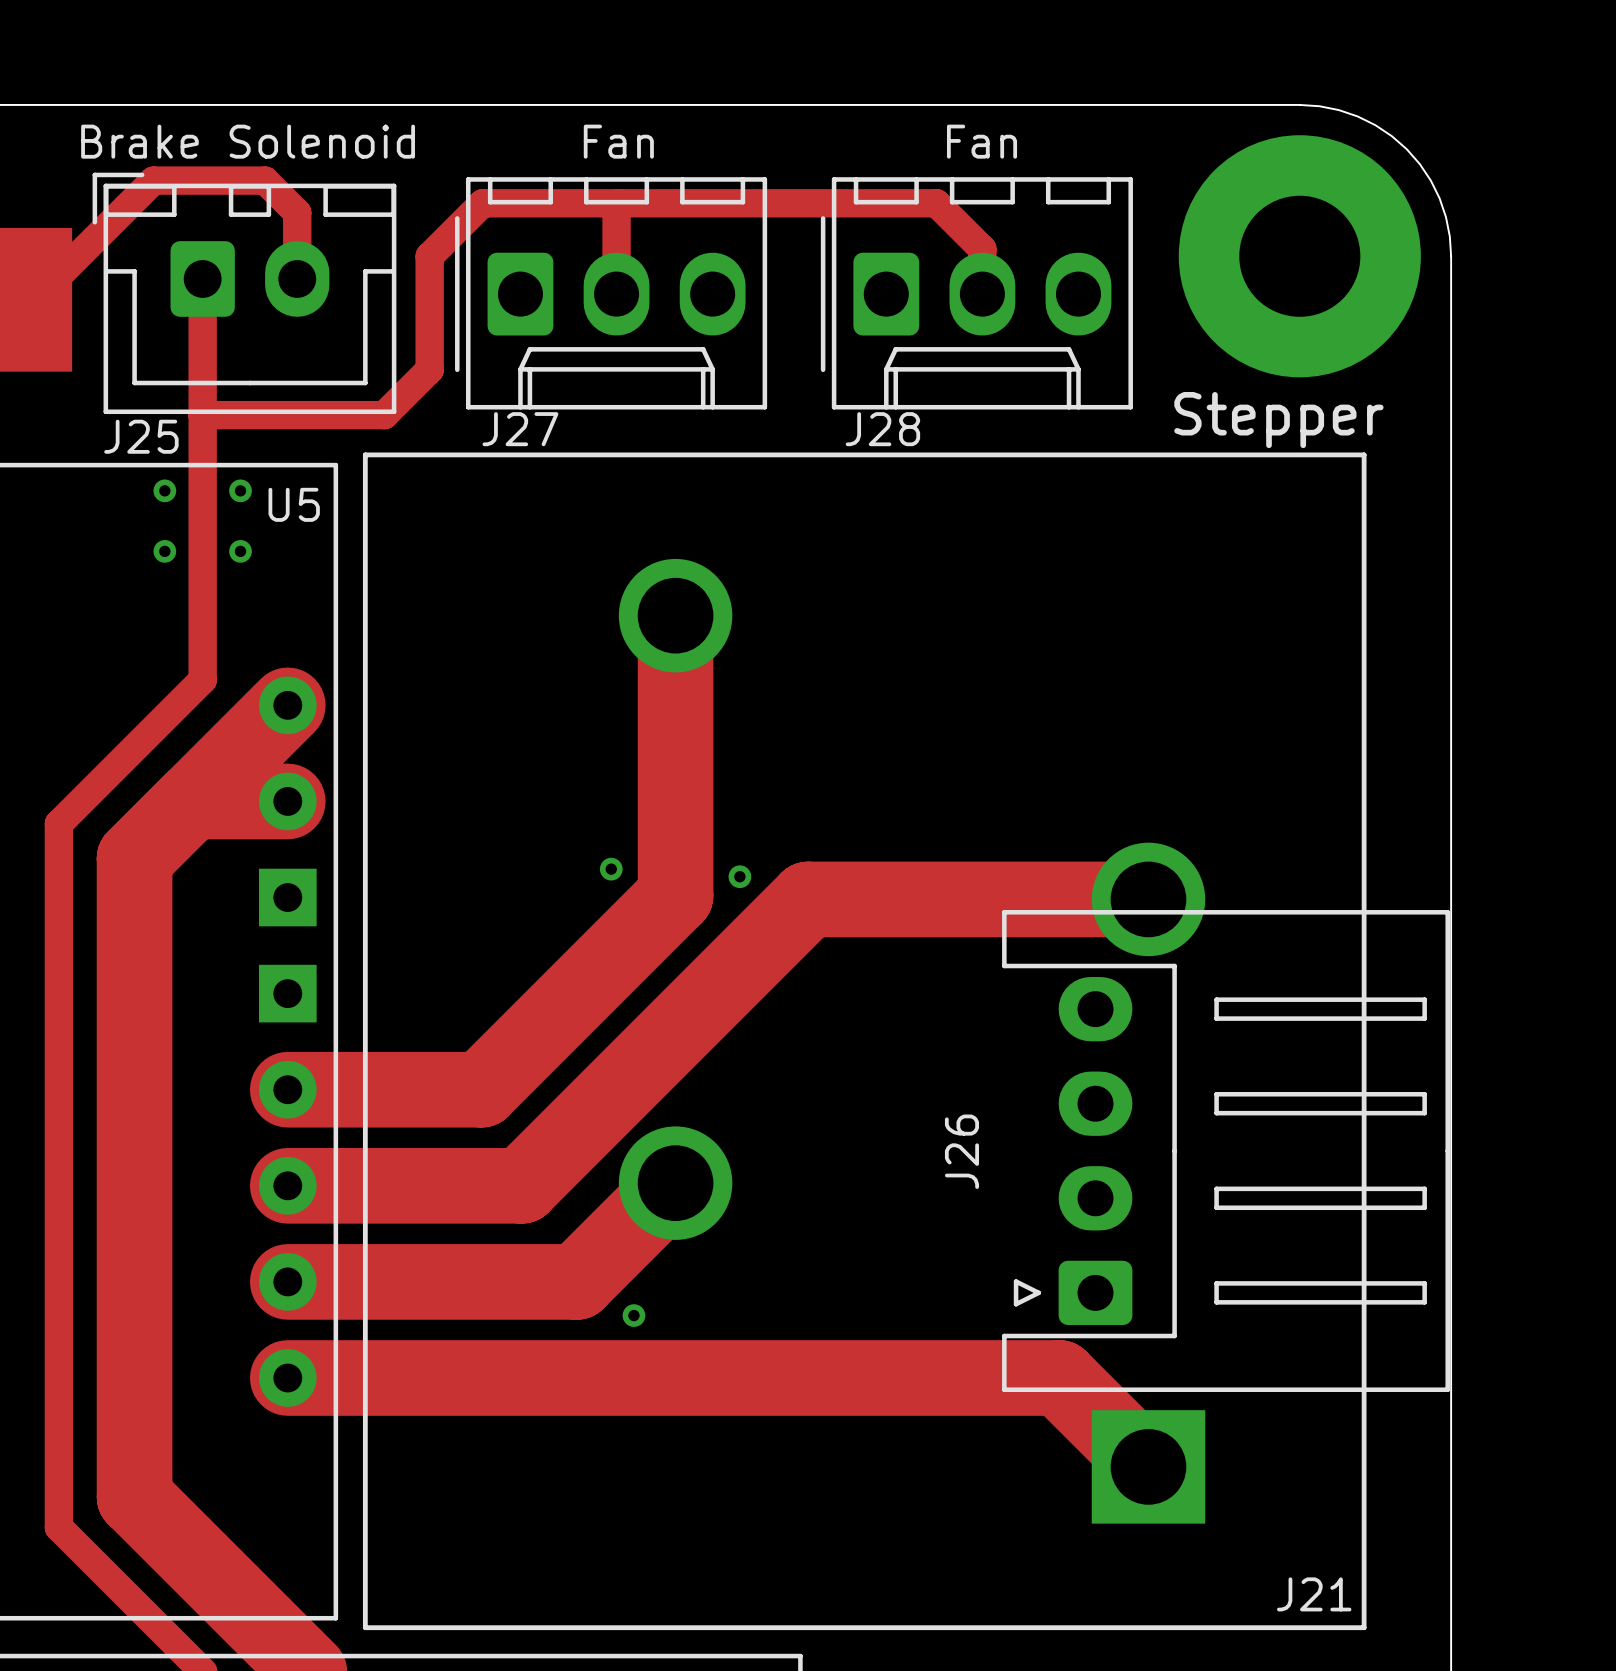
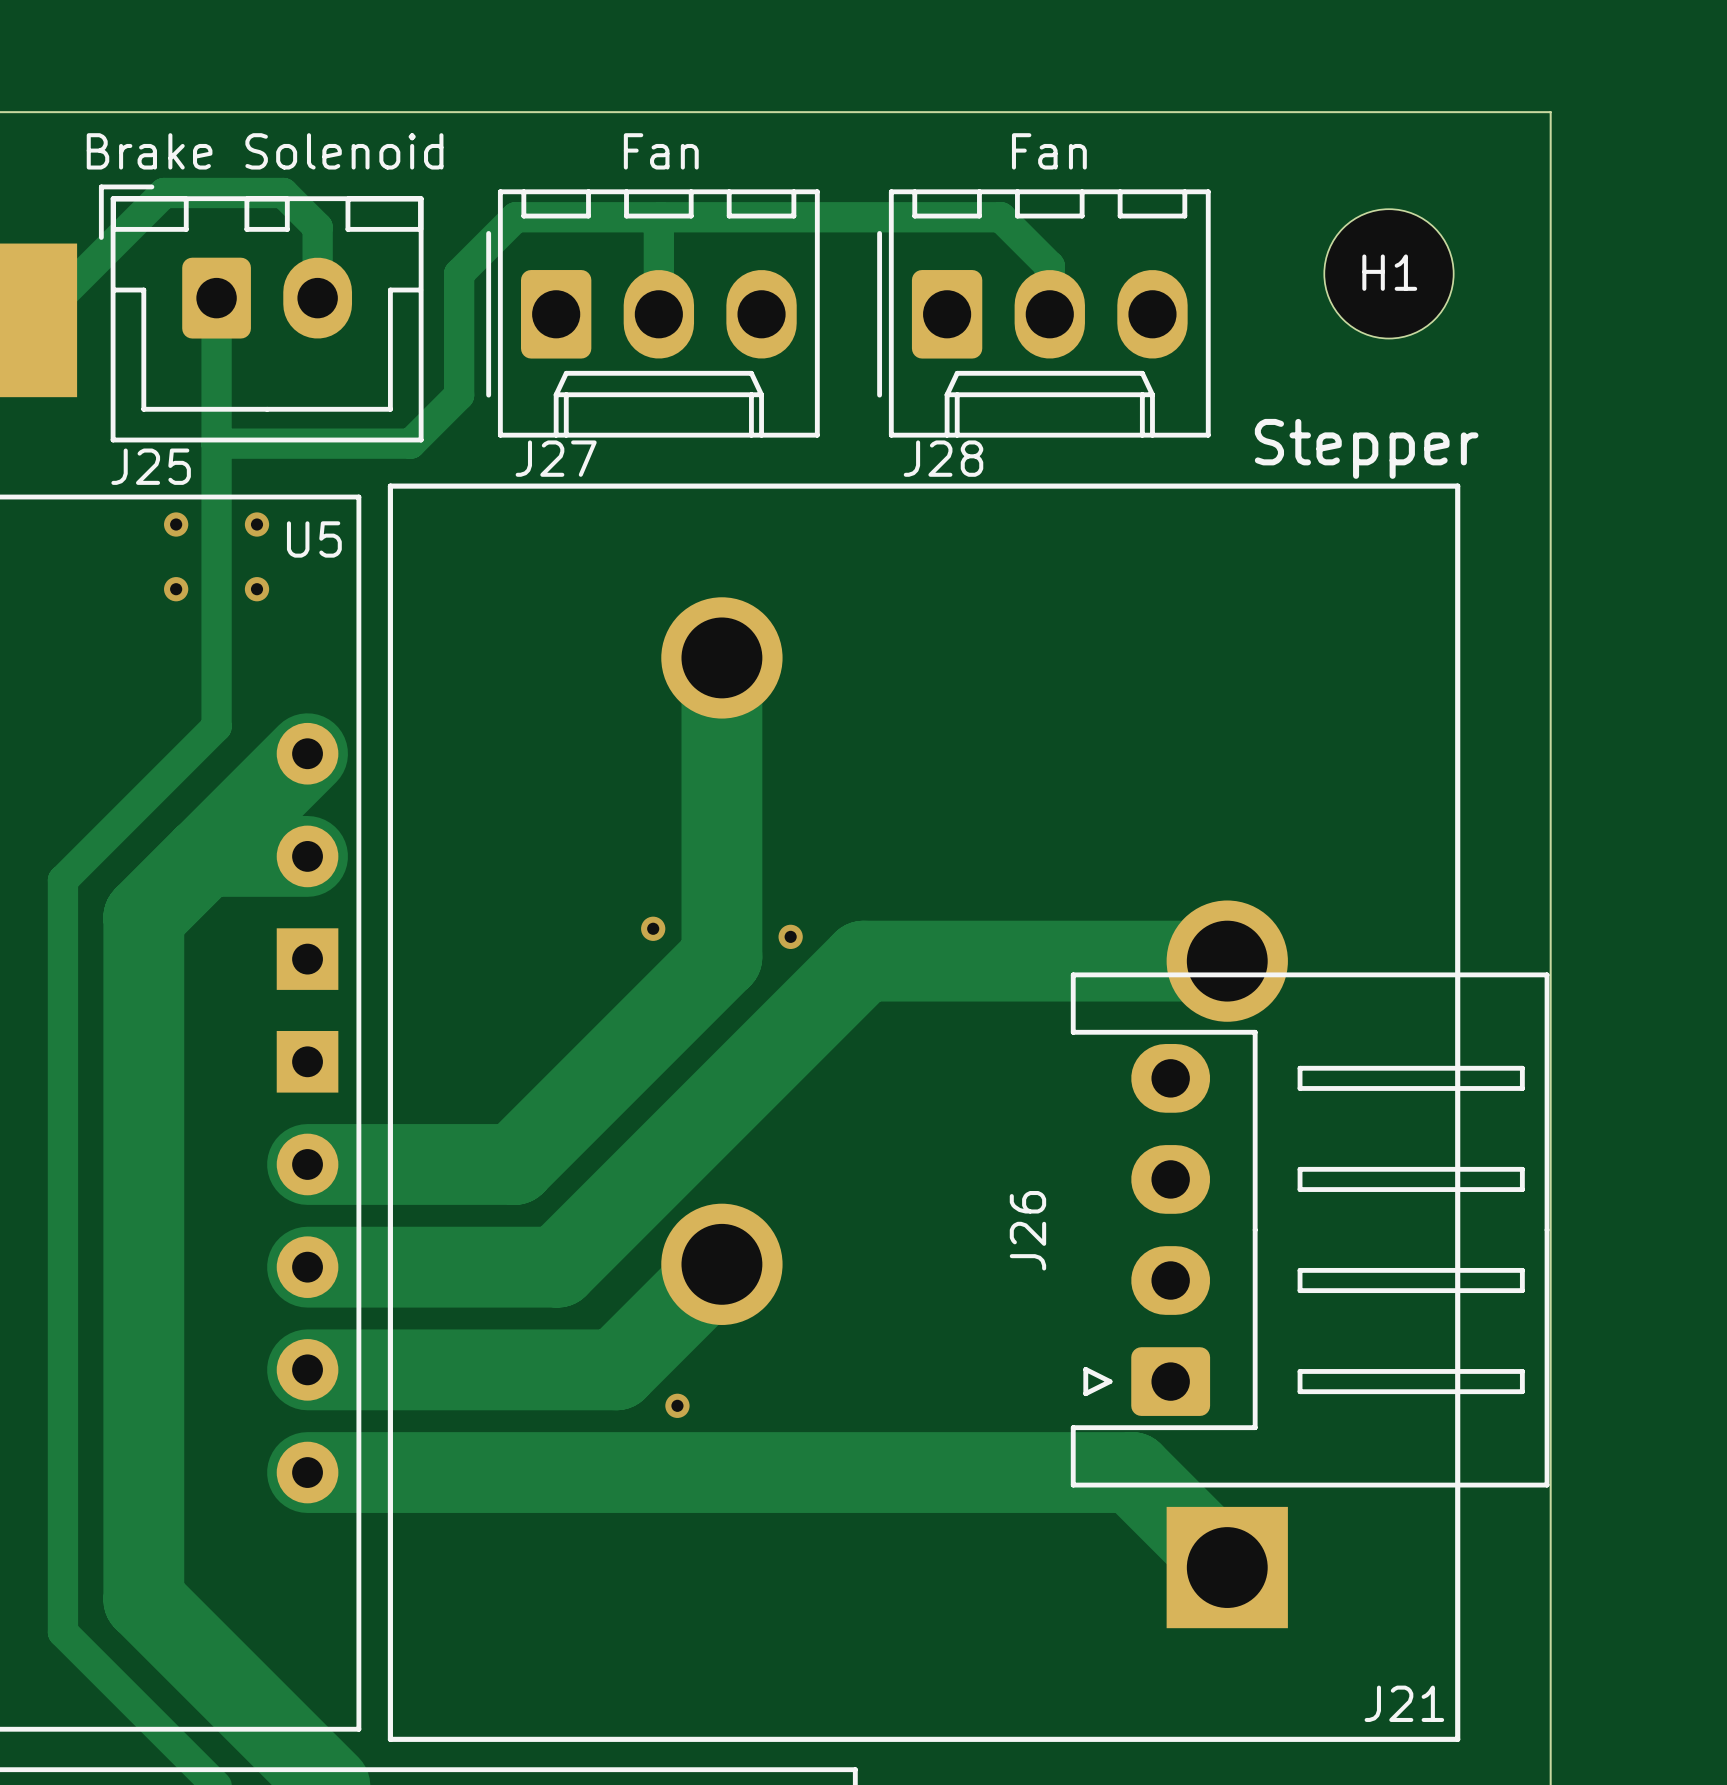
board edge: (1299, 104) (1319, 106) (1357, 116) (1375, 125) (1406, 149) (1430, 180) (1439, 198) (1449, 236) (1451, 256) -> (1388, 112) (1550, 112) (1550, 273)
part: (1299, 256) -> none
H1: none -> (1388, 273)

